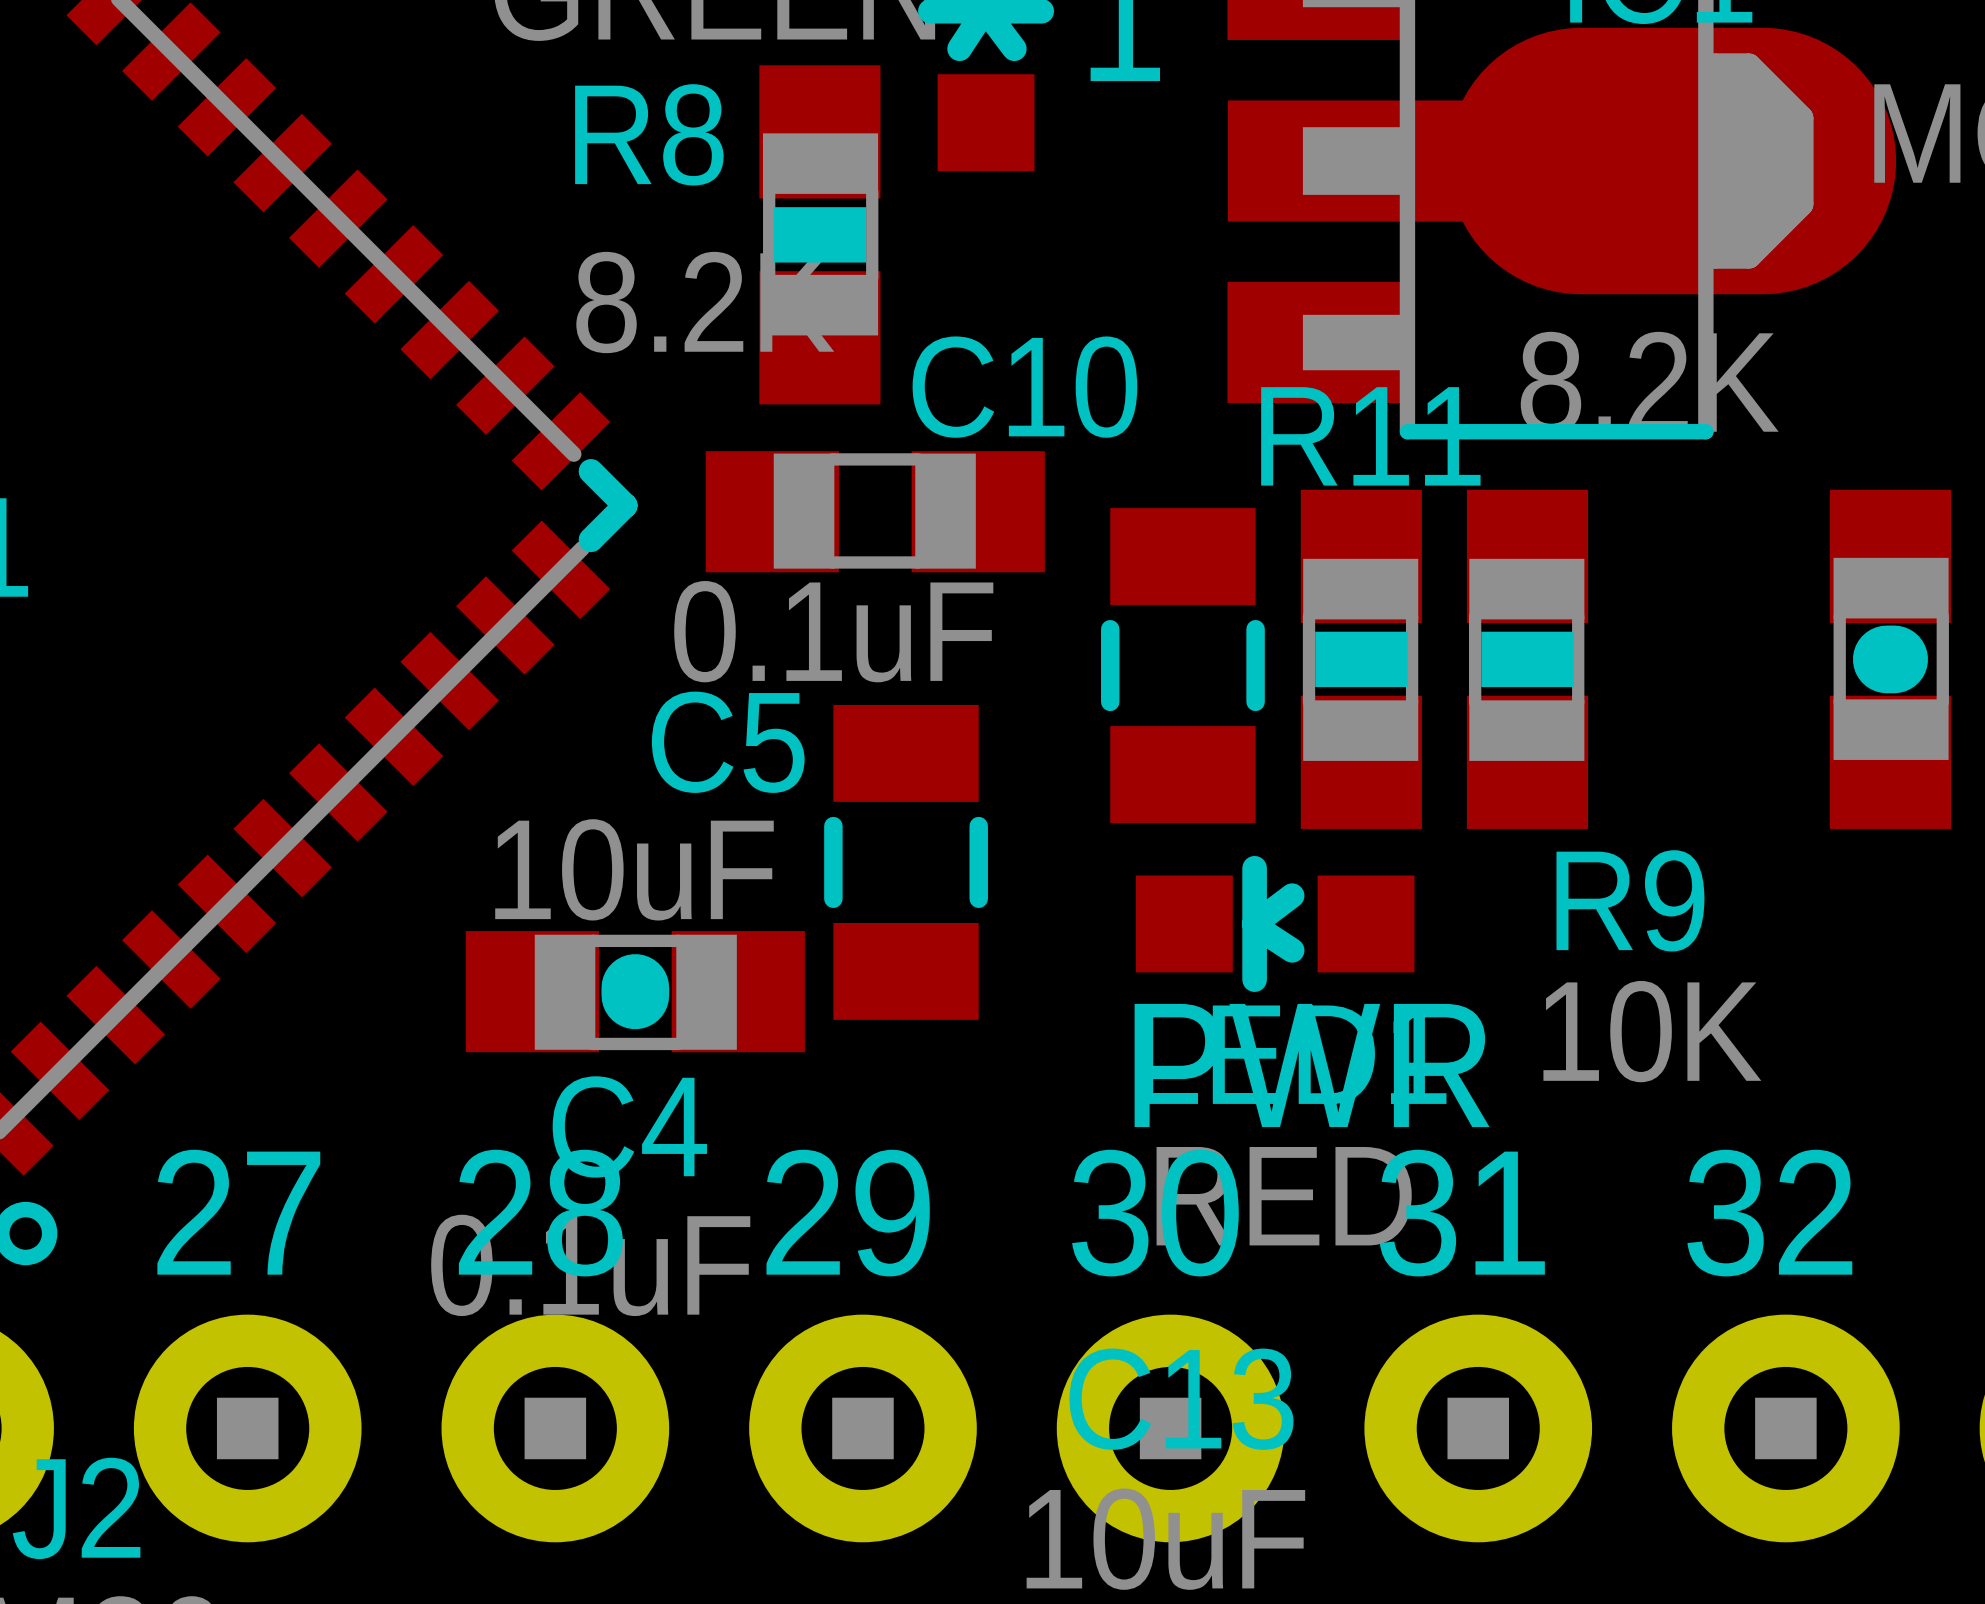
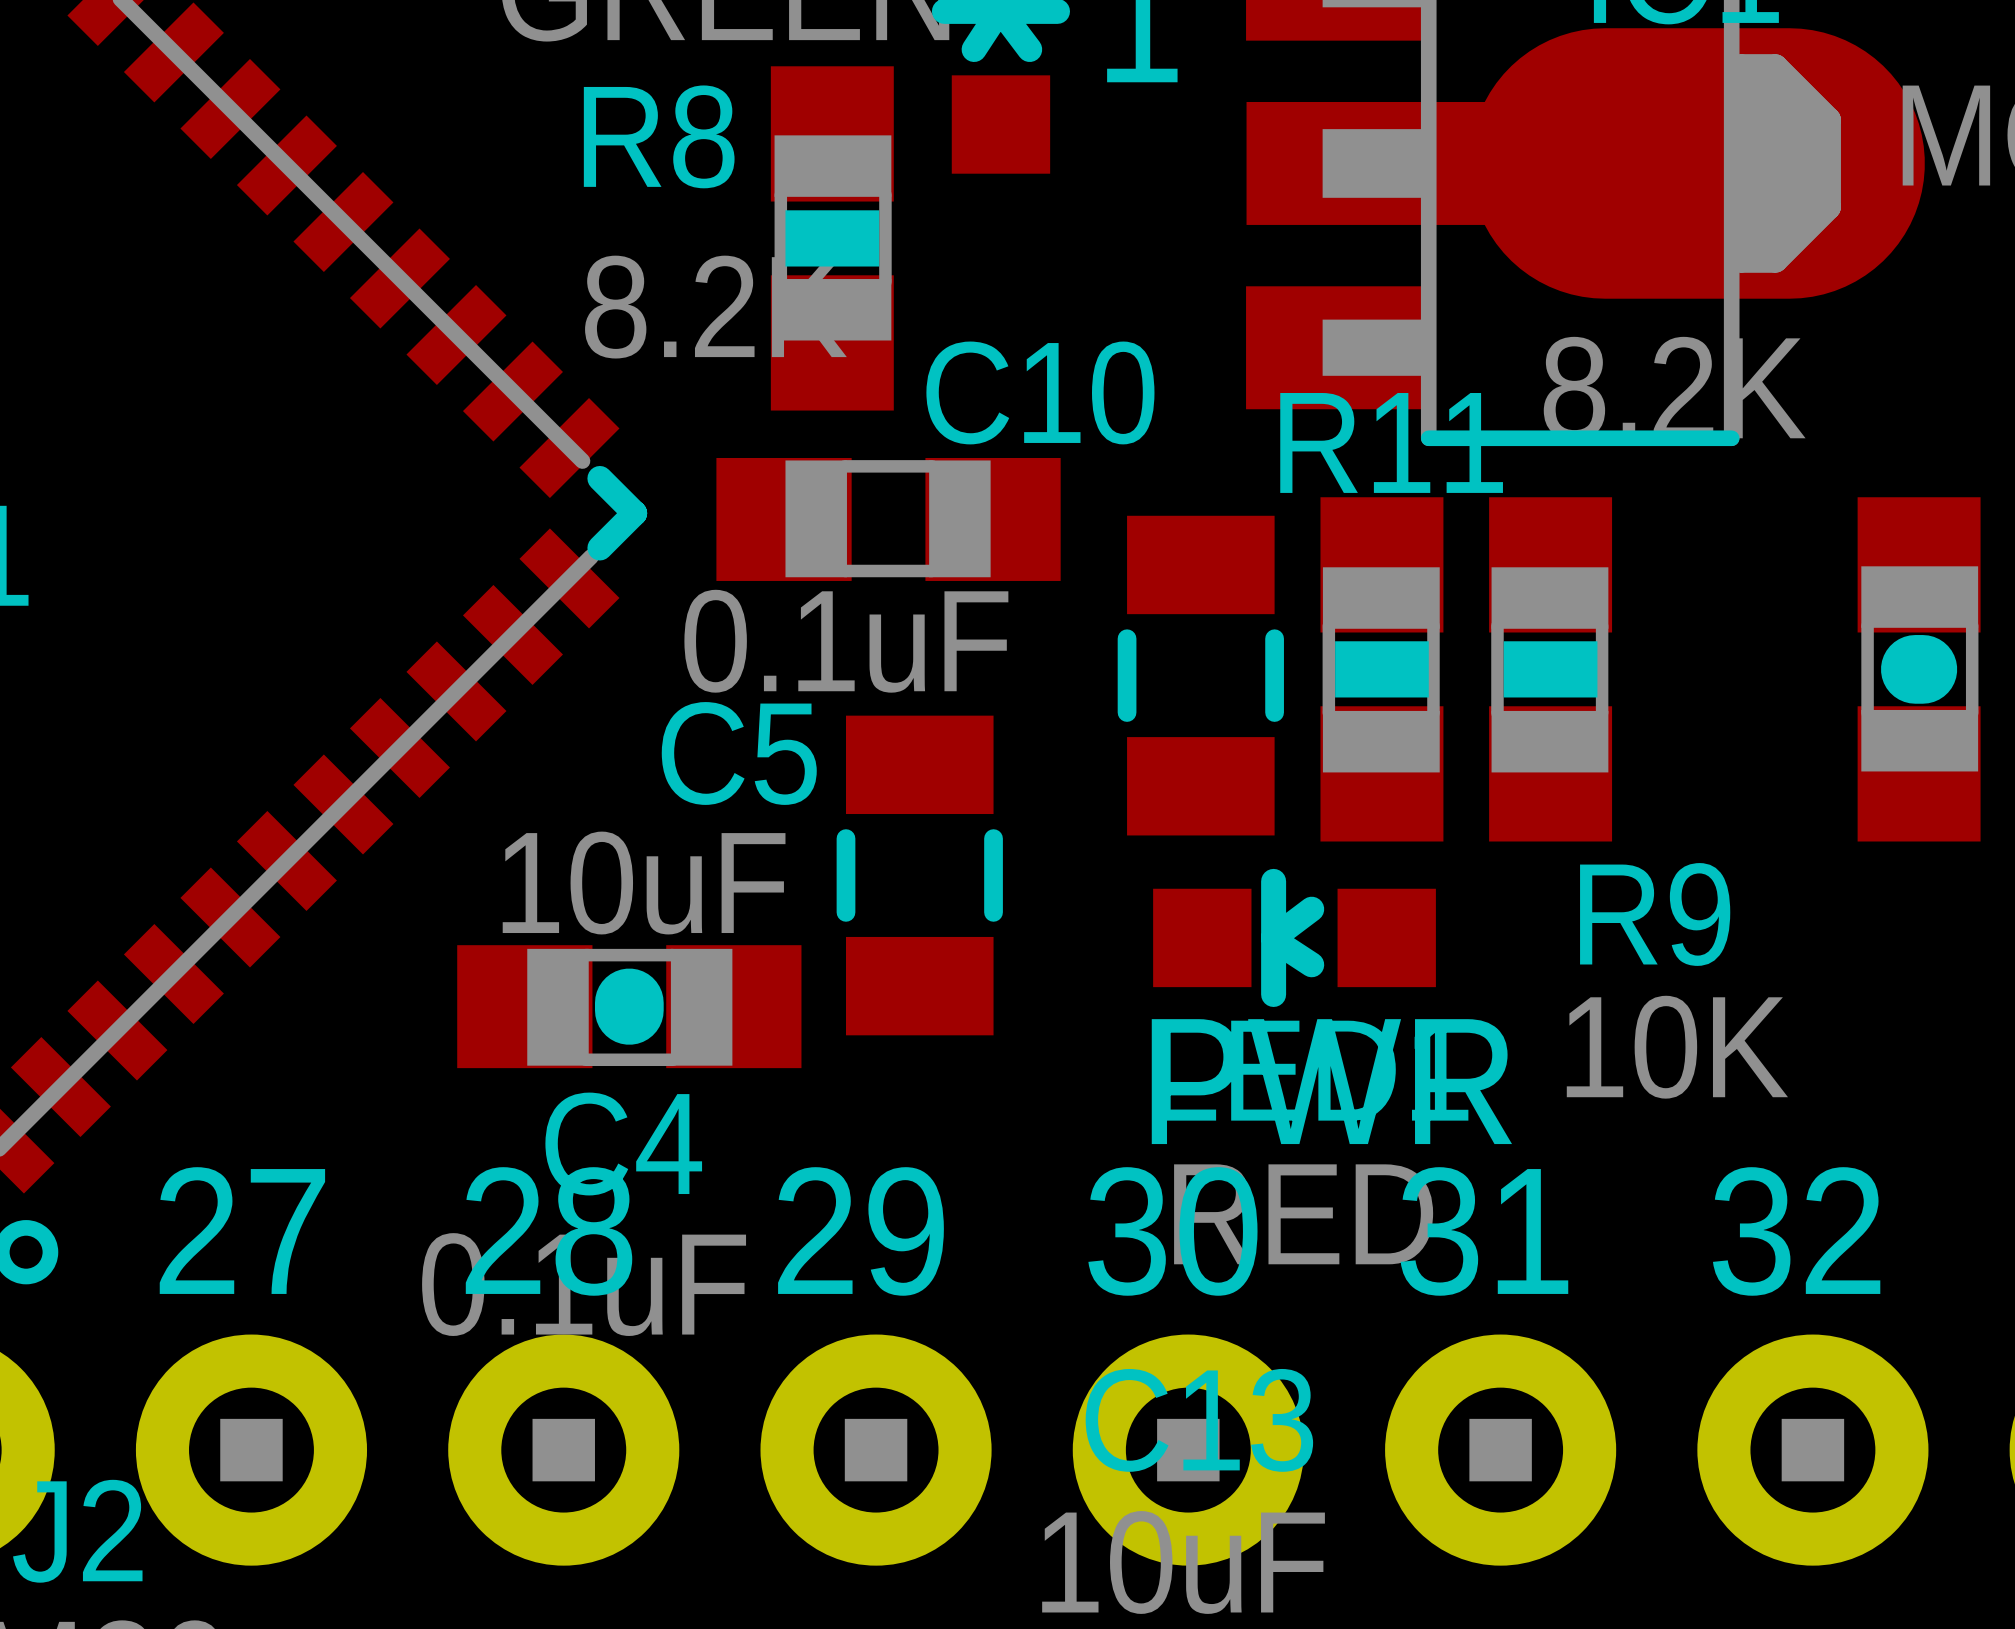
C4 position: (635, 991) -> (629, 1006)

